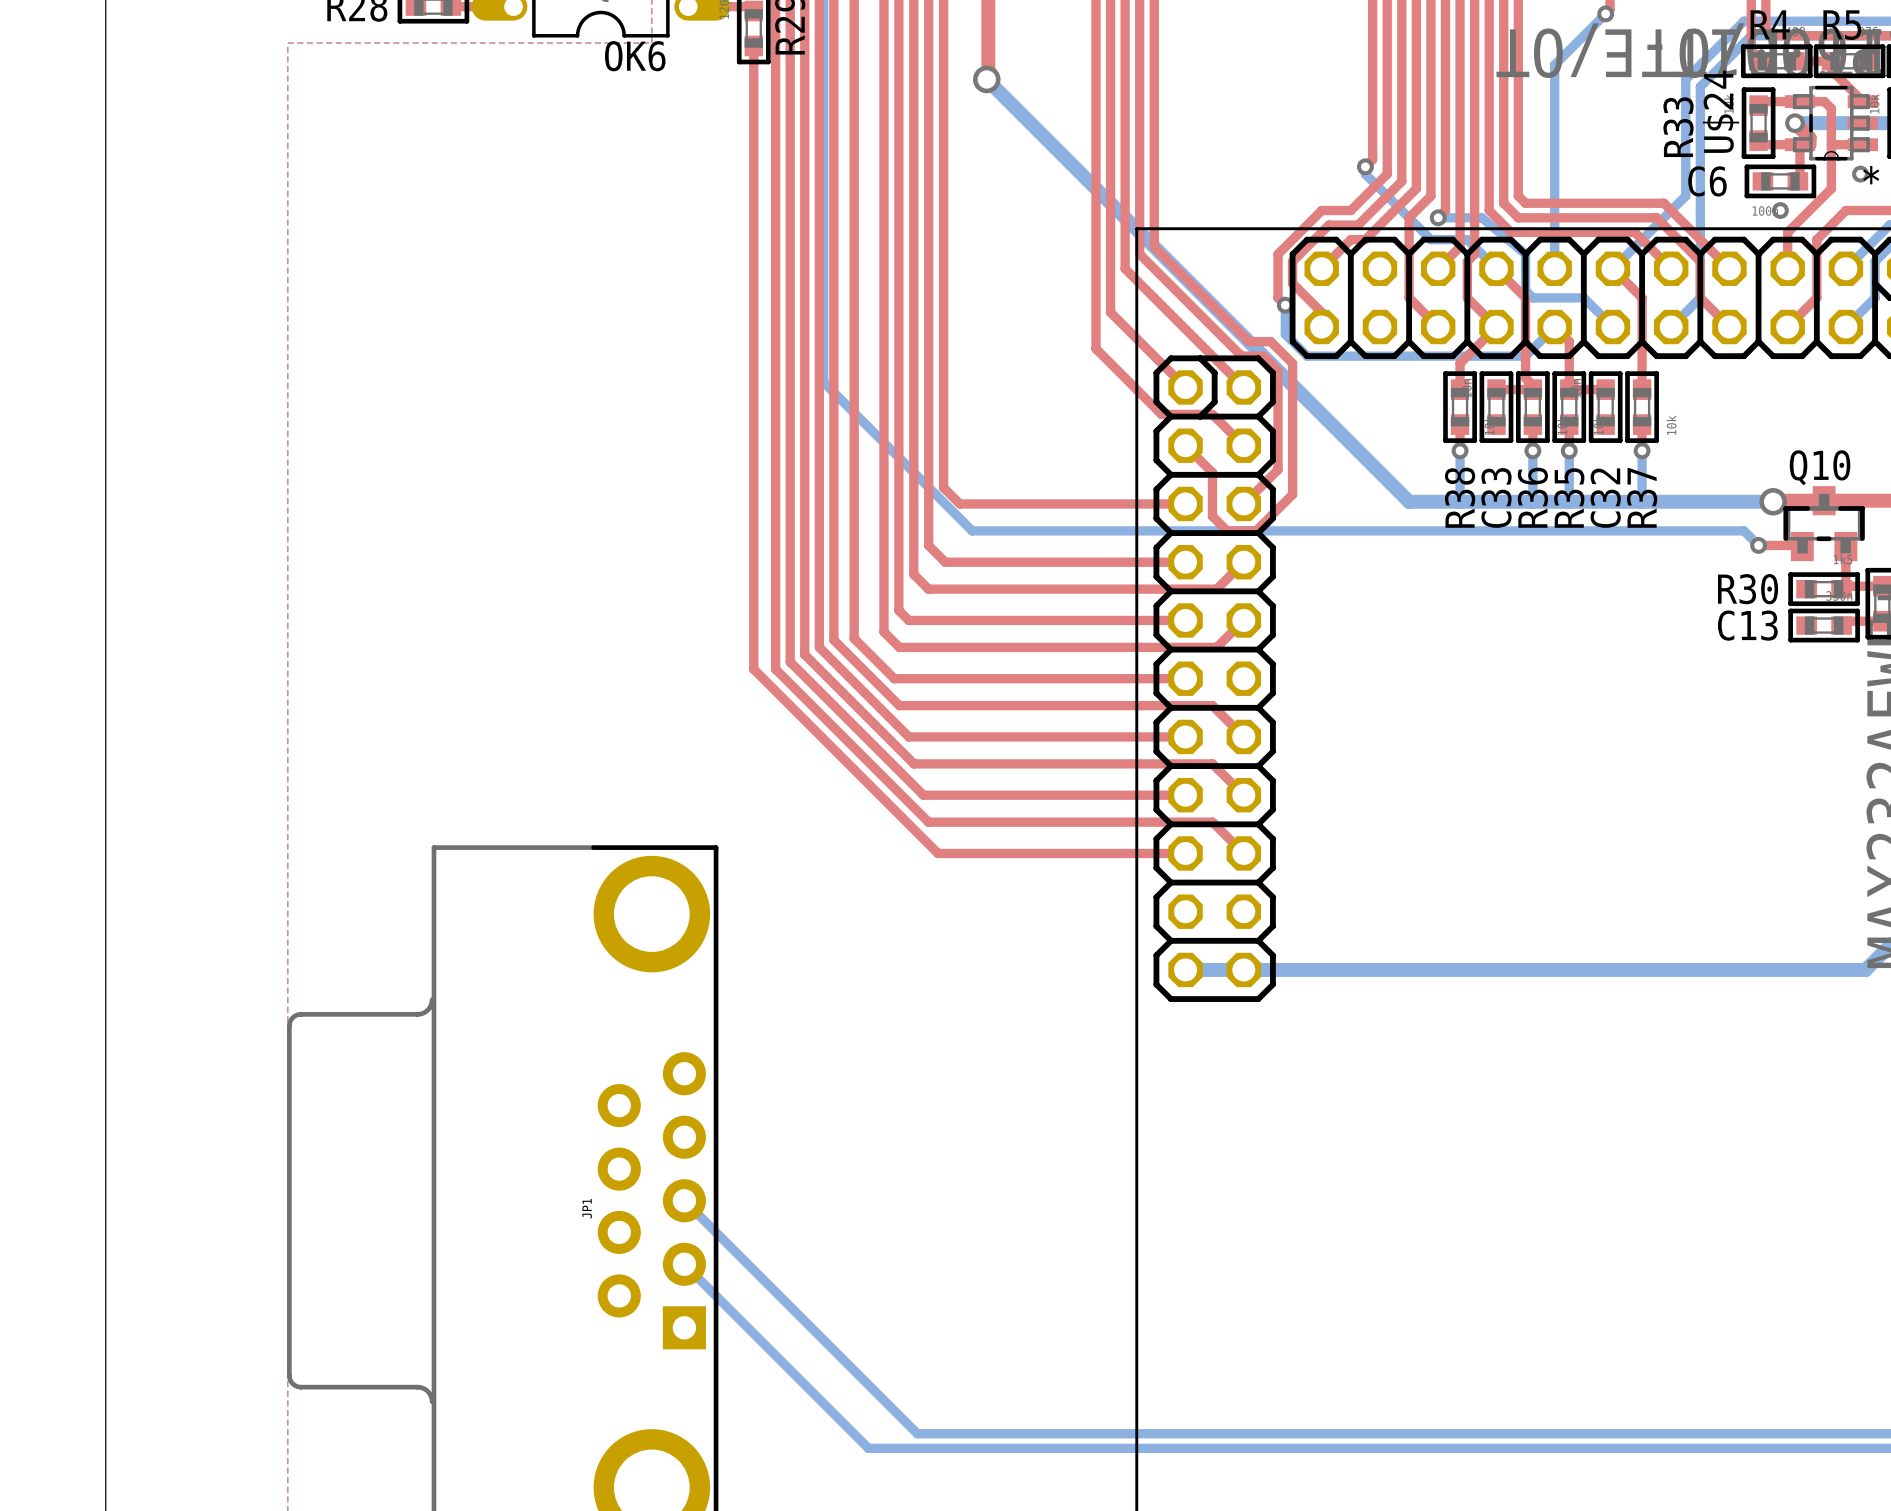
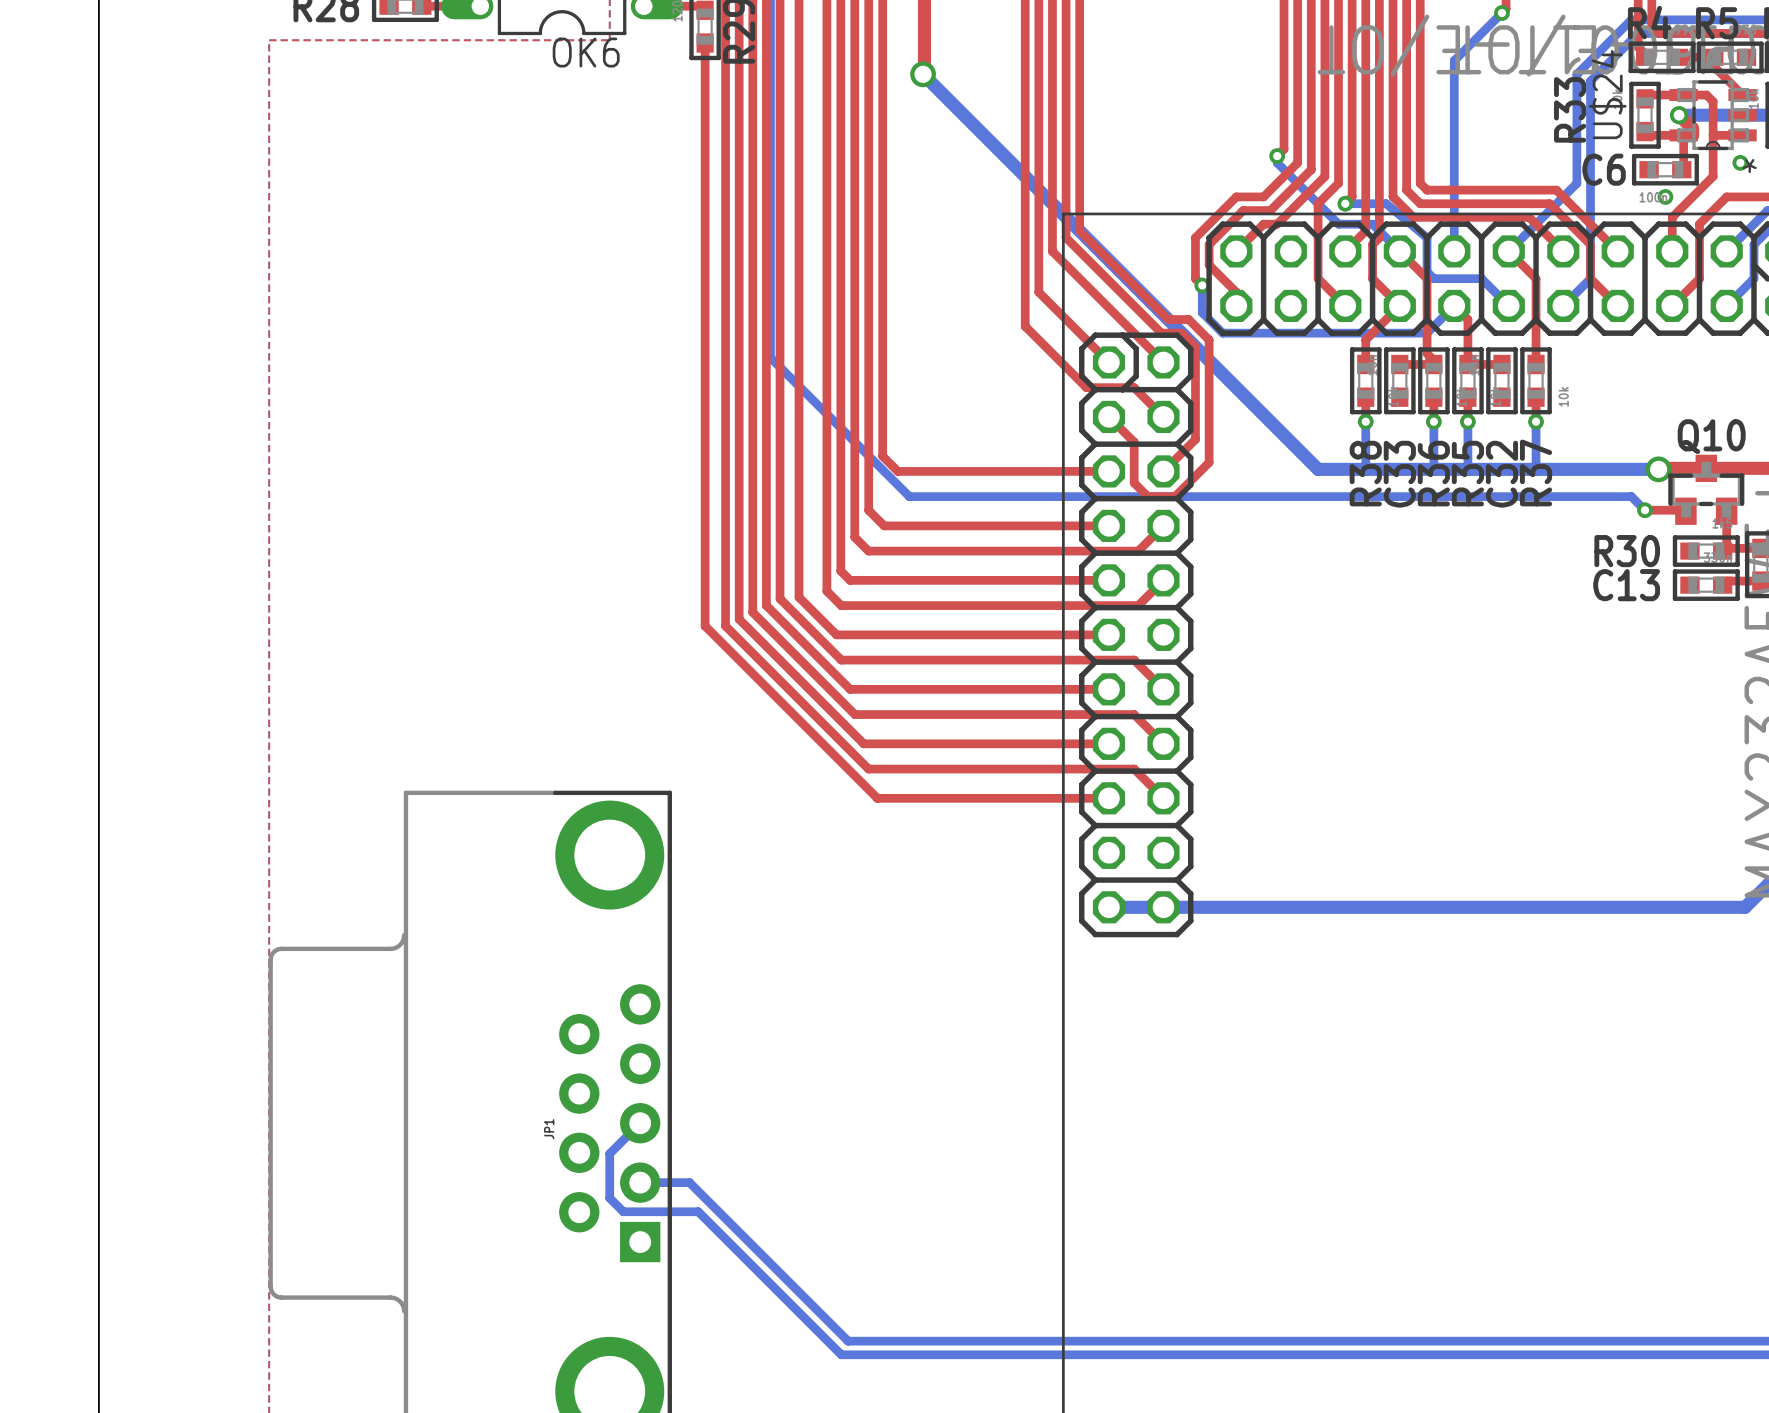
bottom track: (684, 1200) (917, 1433) -> (640, 1123) (609, 1153) (609, 1198) (623, 1211) (698, 1211) (841, 1354)
bottom track: (684, 1264) (868, 1448) (899, 1448) -> (640, 1182) (689, 1182) (848, 1341) (858, 1341)

